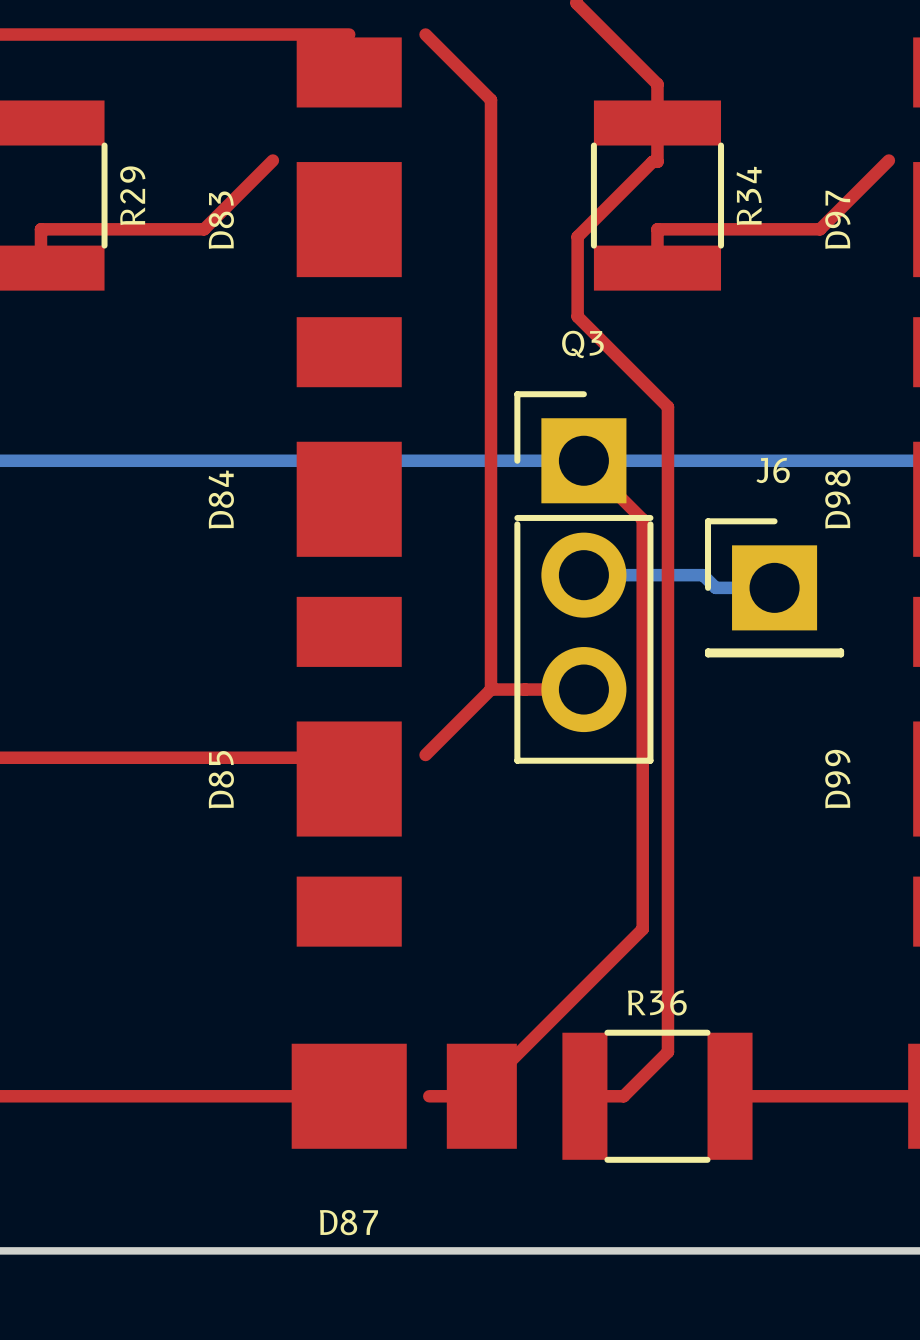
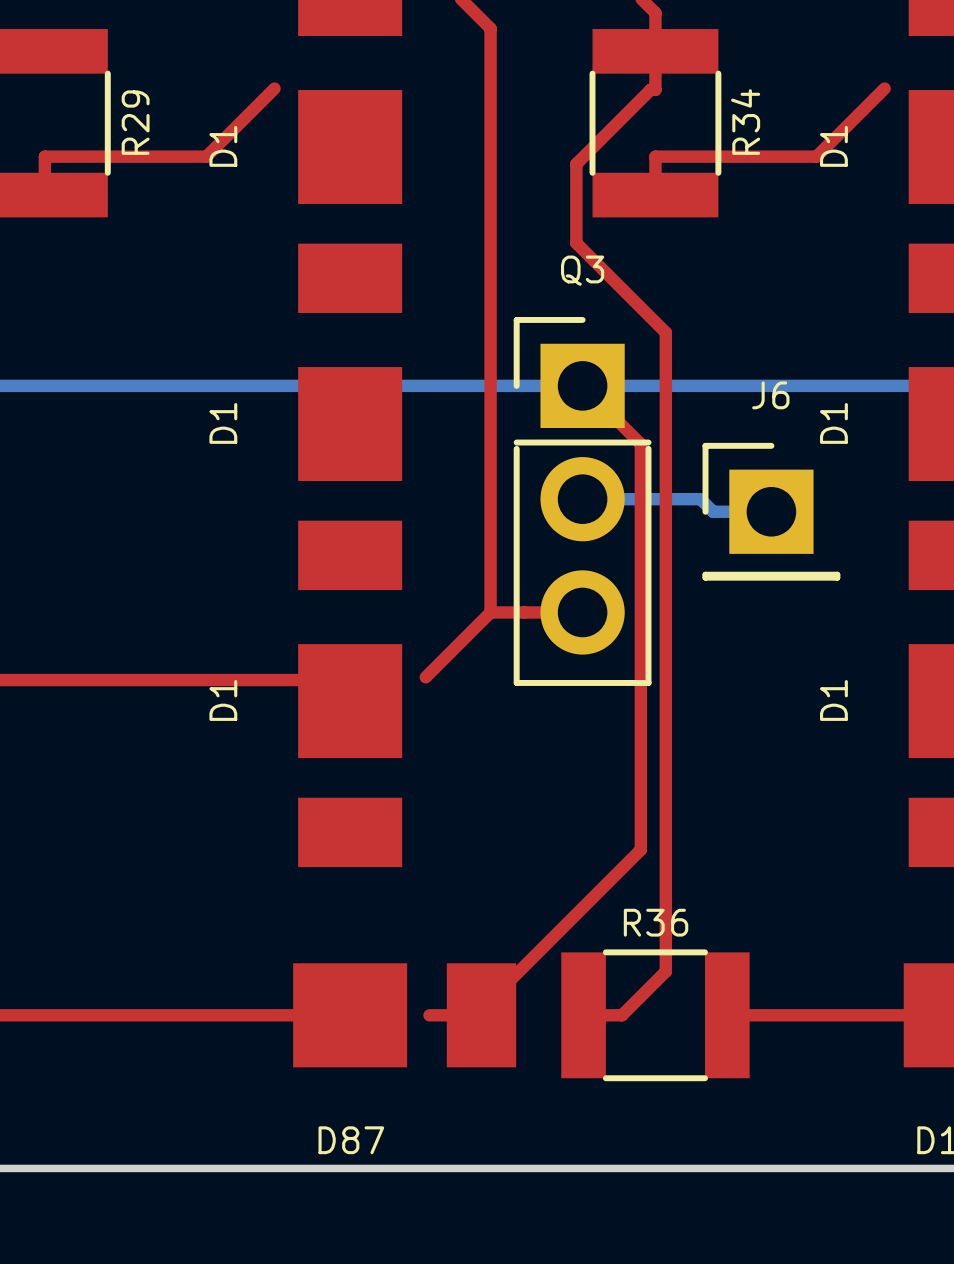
D97 name: D97 (837, 219) -> D1 (833, 146)
D83 name: D83 (221, 220) -> D1 (223, 146)
D84 name: D84 (221, 499) -> D1 (223, 423)
D98 name: D98 (837, 499) -> D1 (833, 423)
D85 name: D85 (221, 779) -> D1 (223, 700)
D99 name: D99 (837, 779) -> D1 (833, 700)

